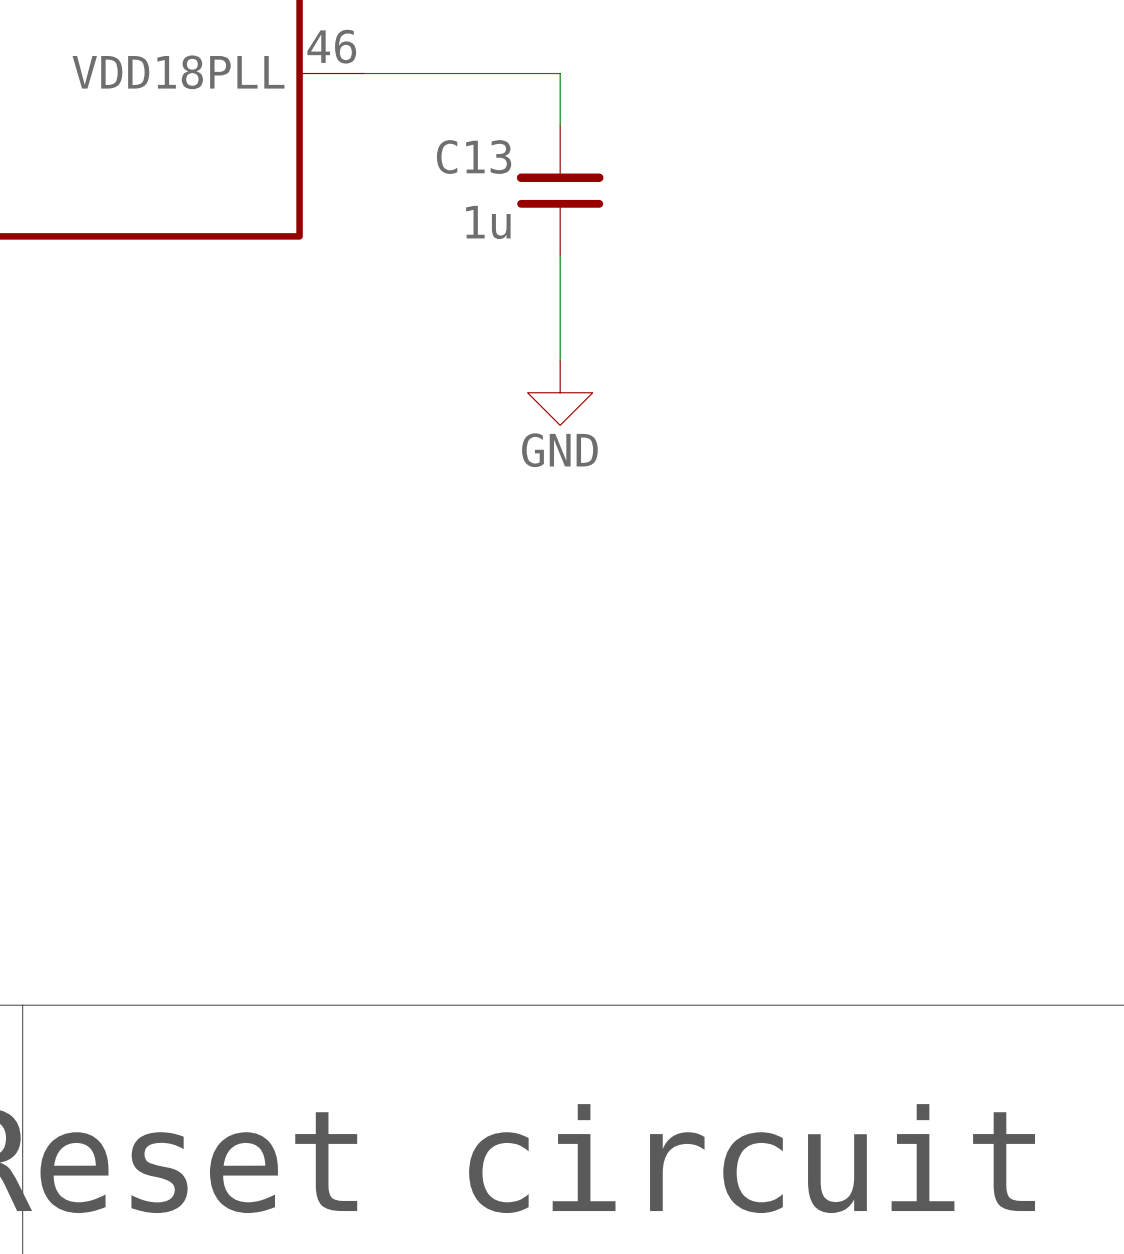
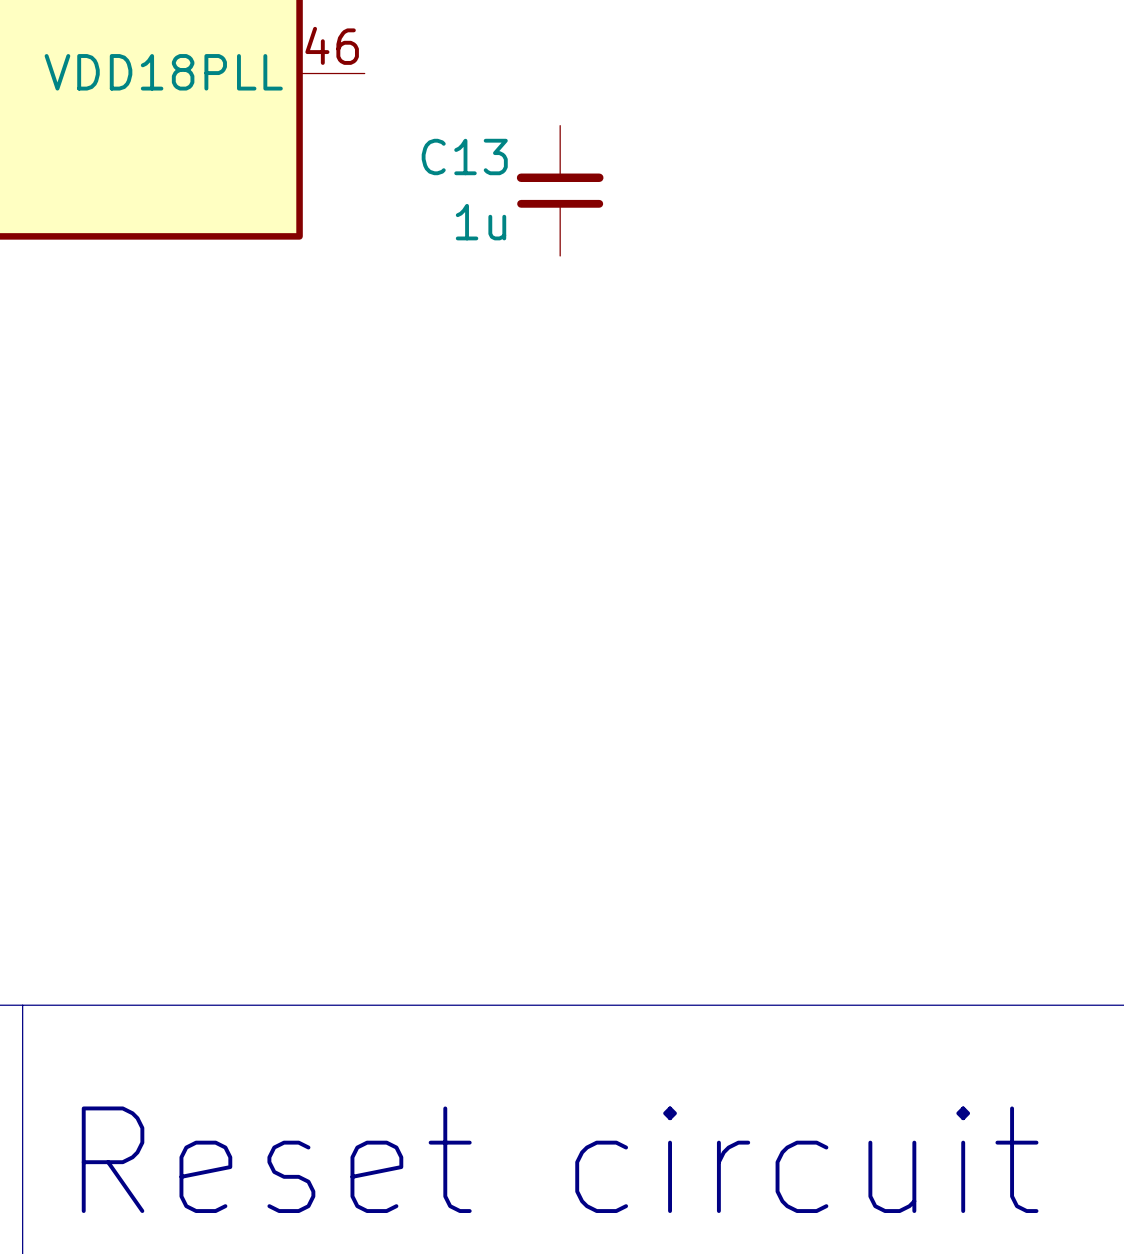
wire: (364, 73) (560, 73) (560, 125) -> none
wire: (560, 255) (560, 360) -> none
power symbol: GND (560, 392) -> none

